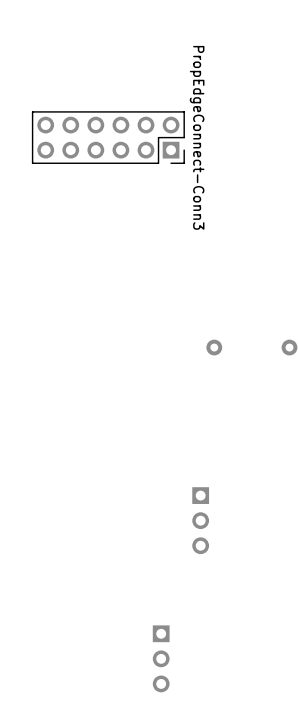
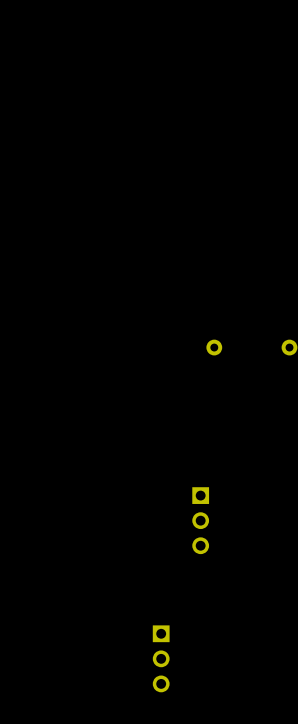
PropEdgeConnect-Conn3: (108, 137) -> none

